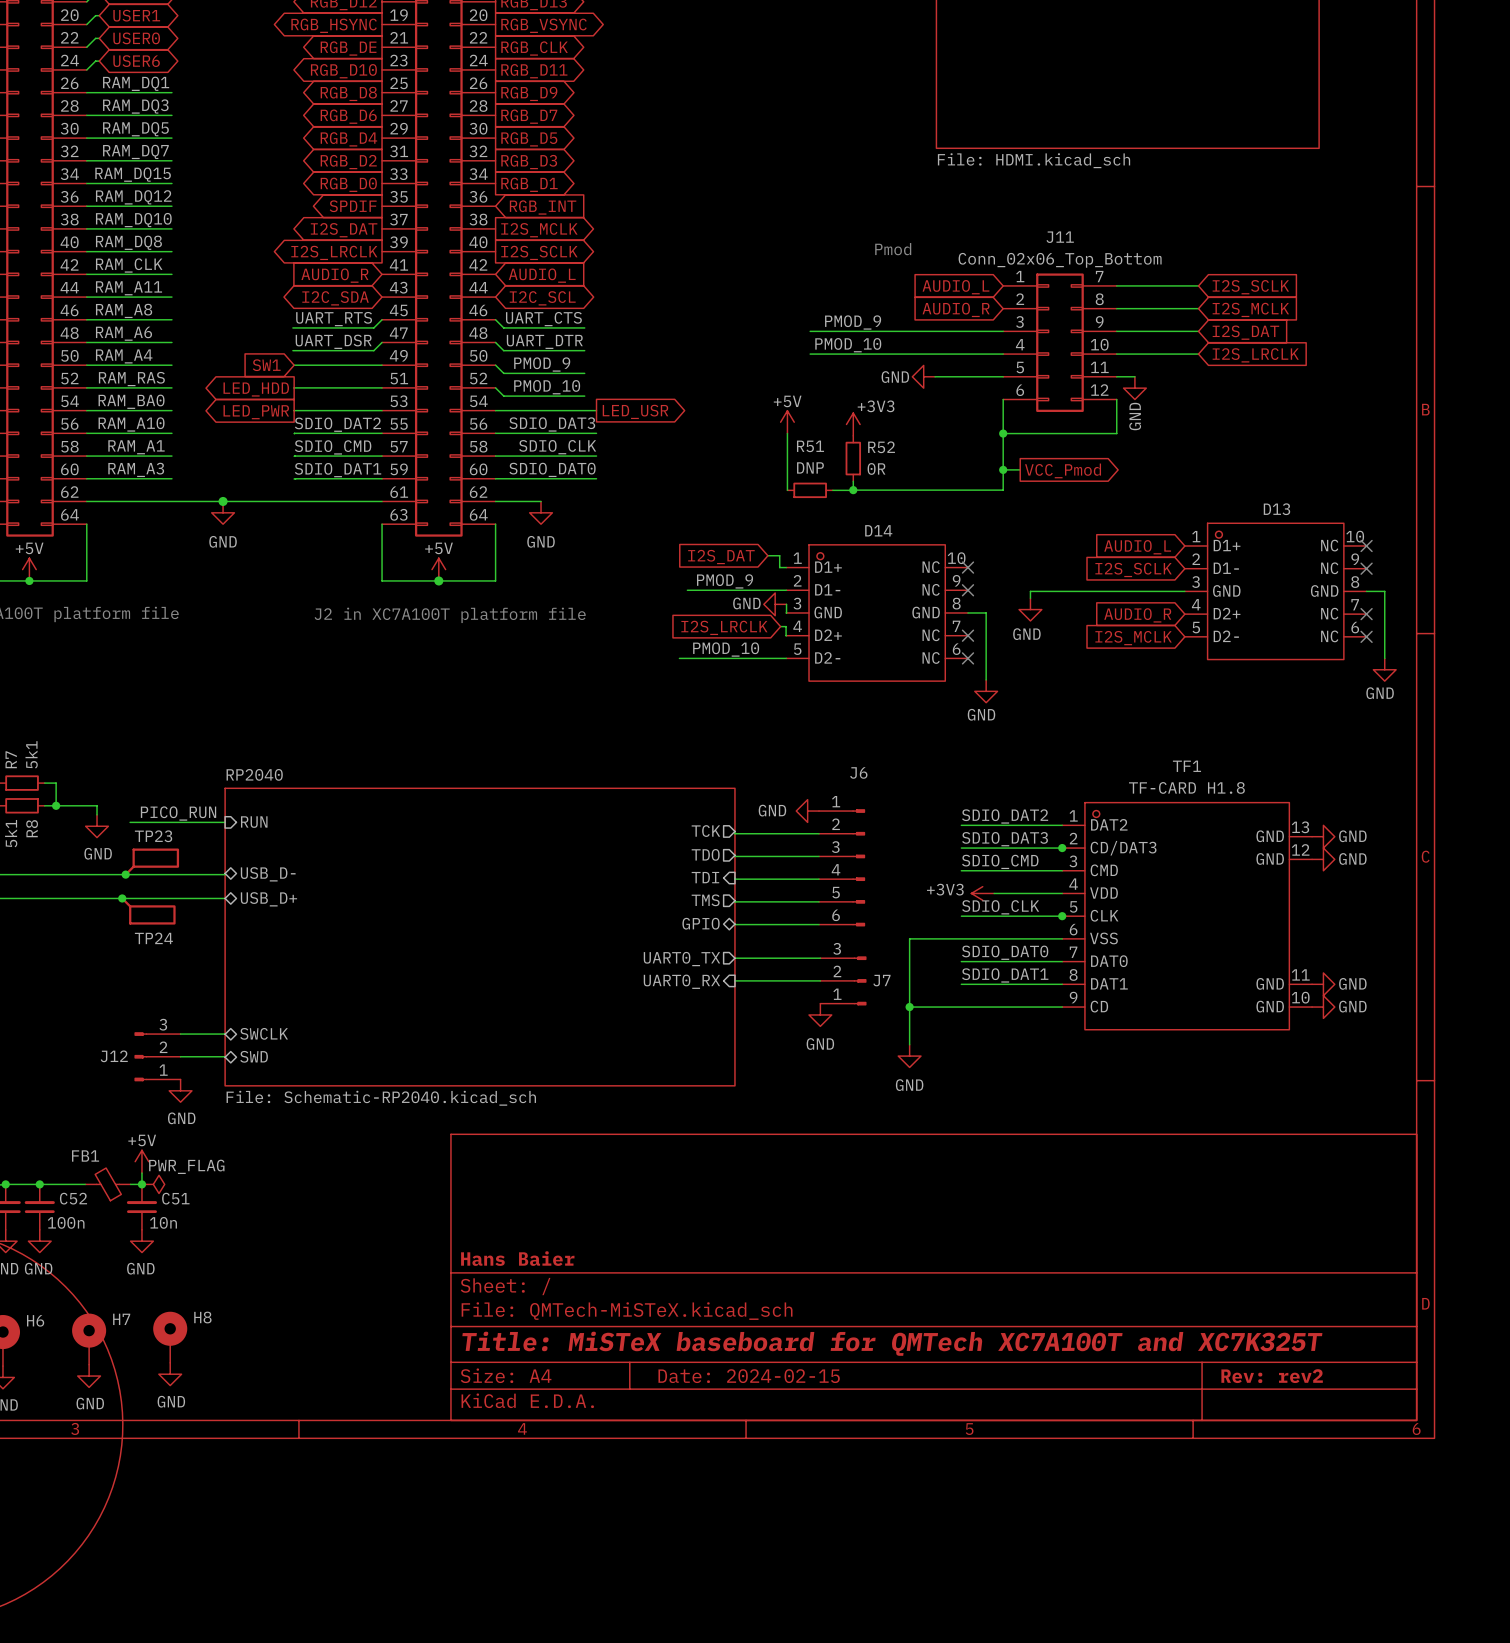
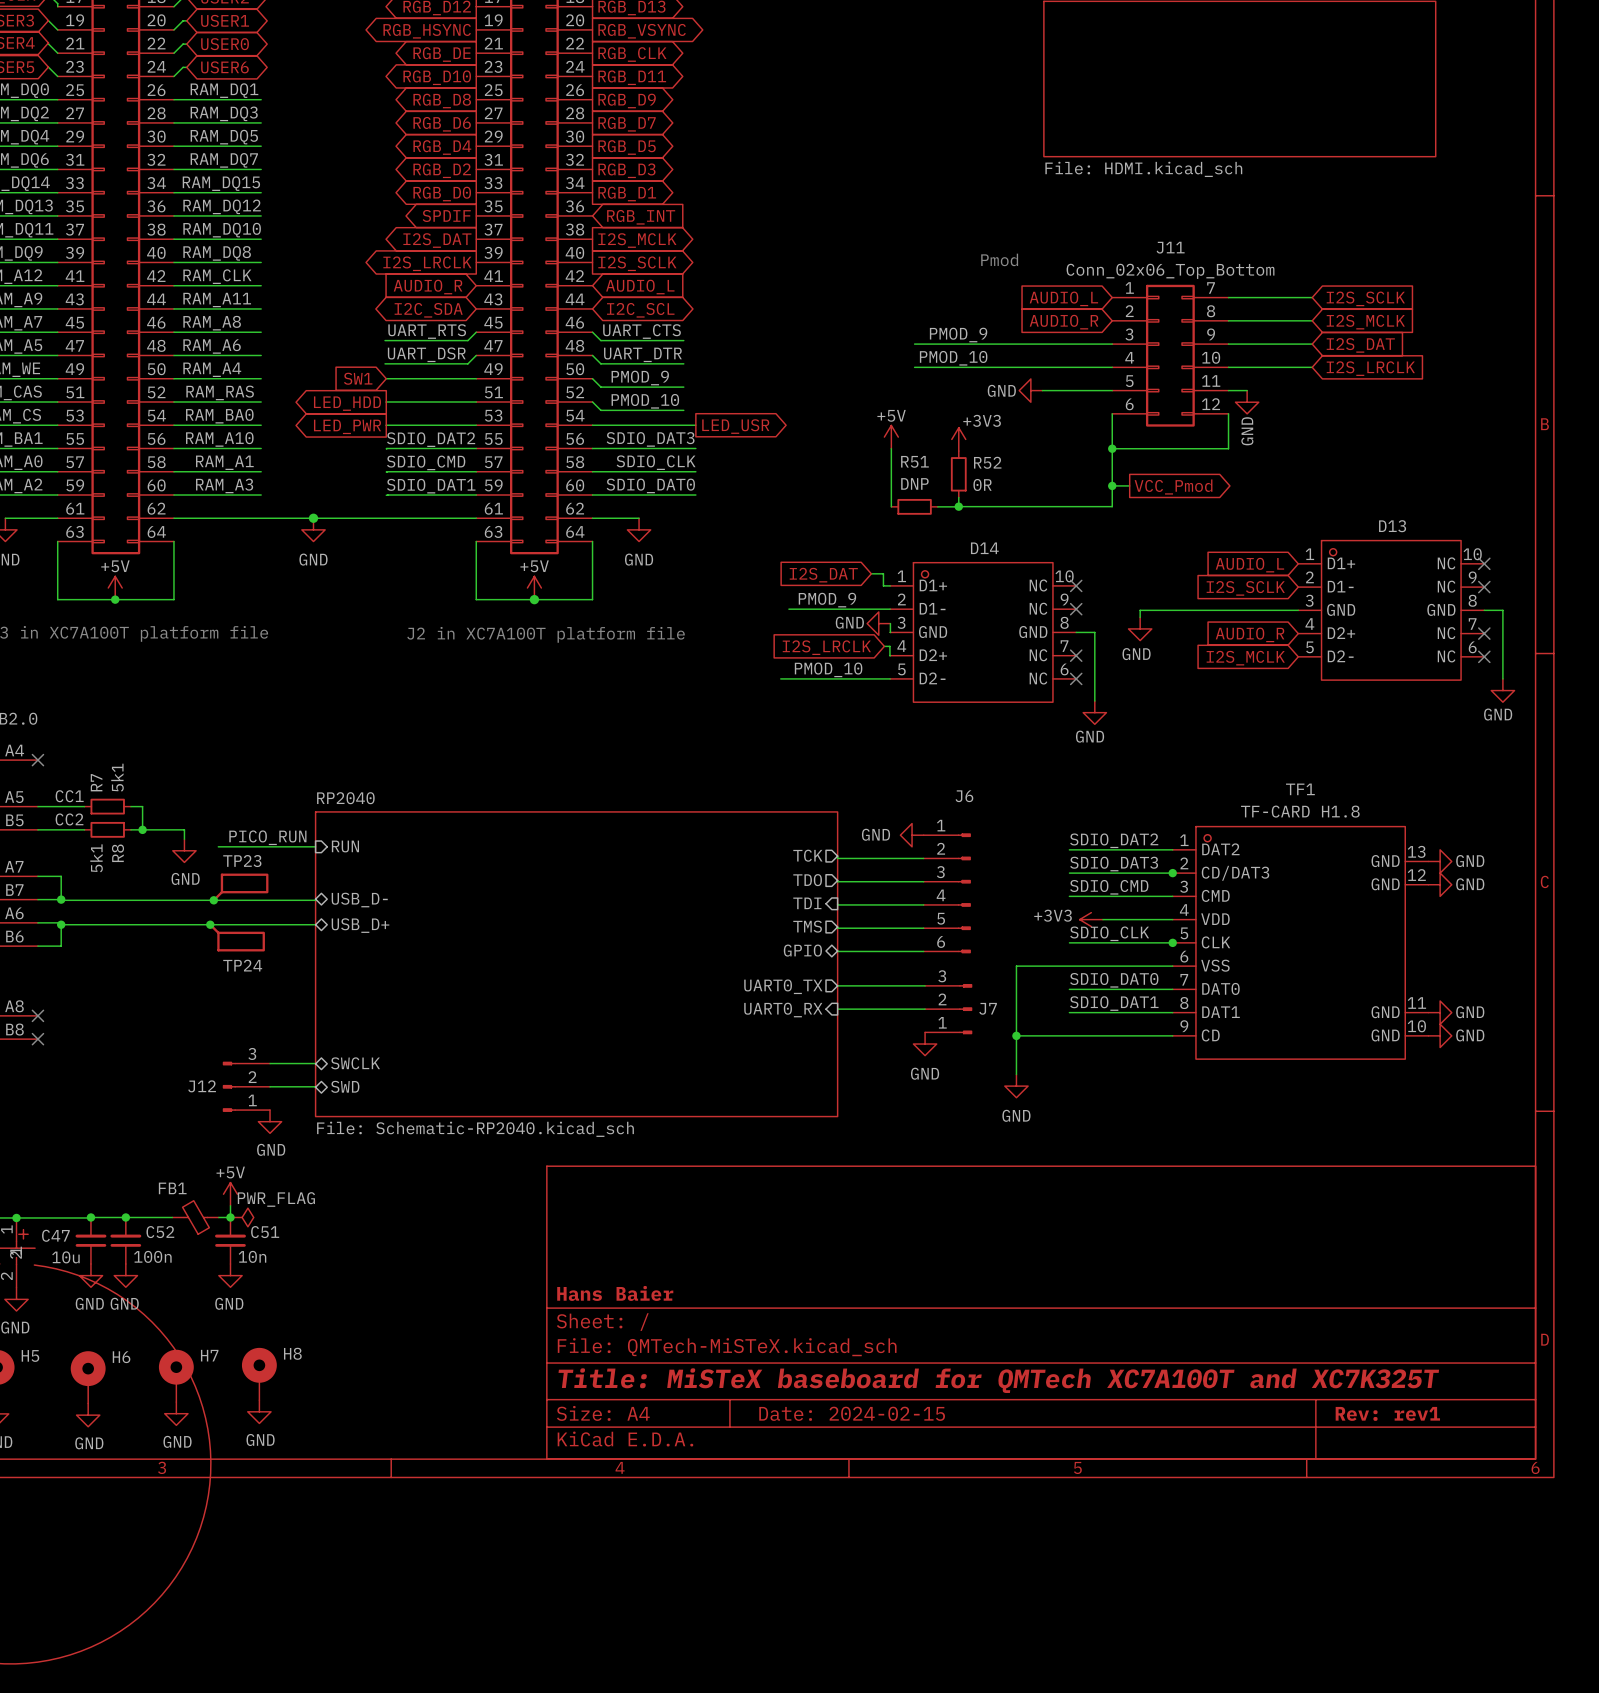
title block: Rev: rev2 (1272, 1376) -> Rev: rev1 (1387, 1413)

